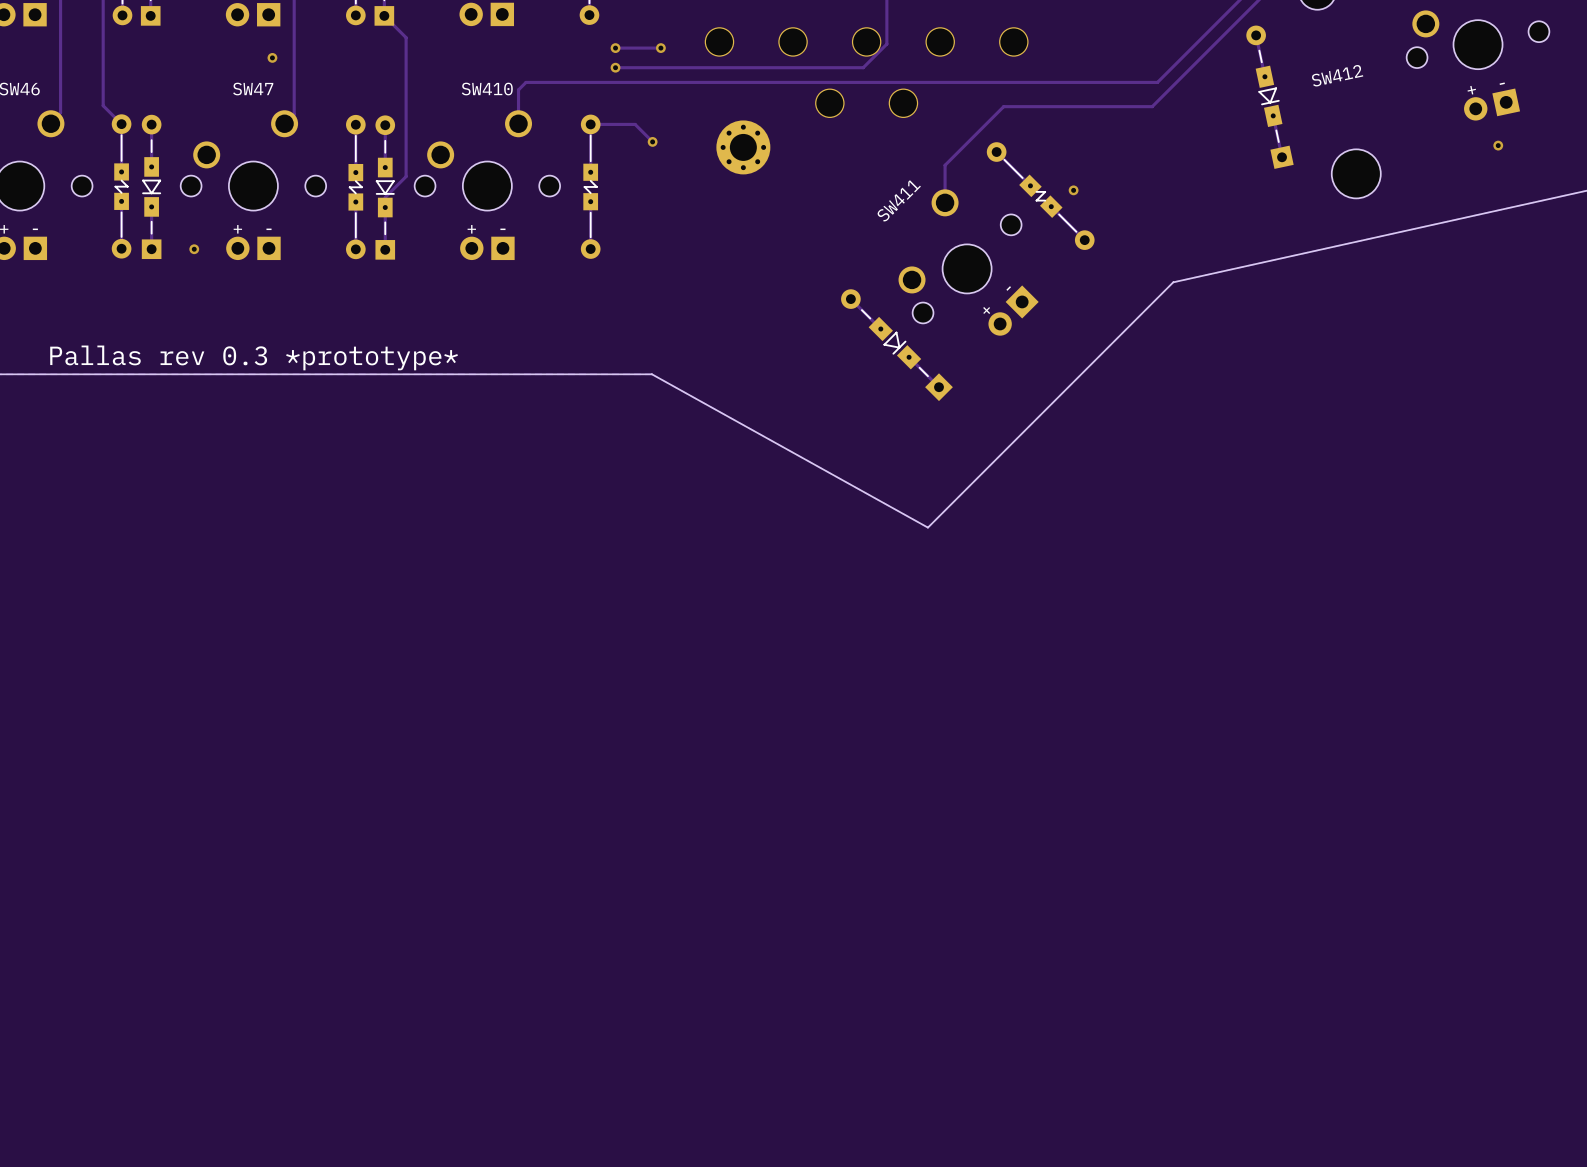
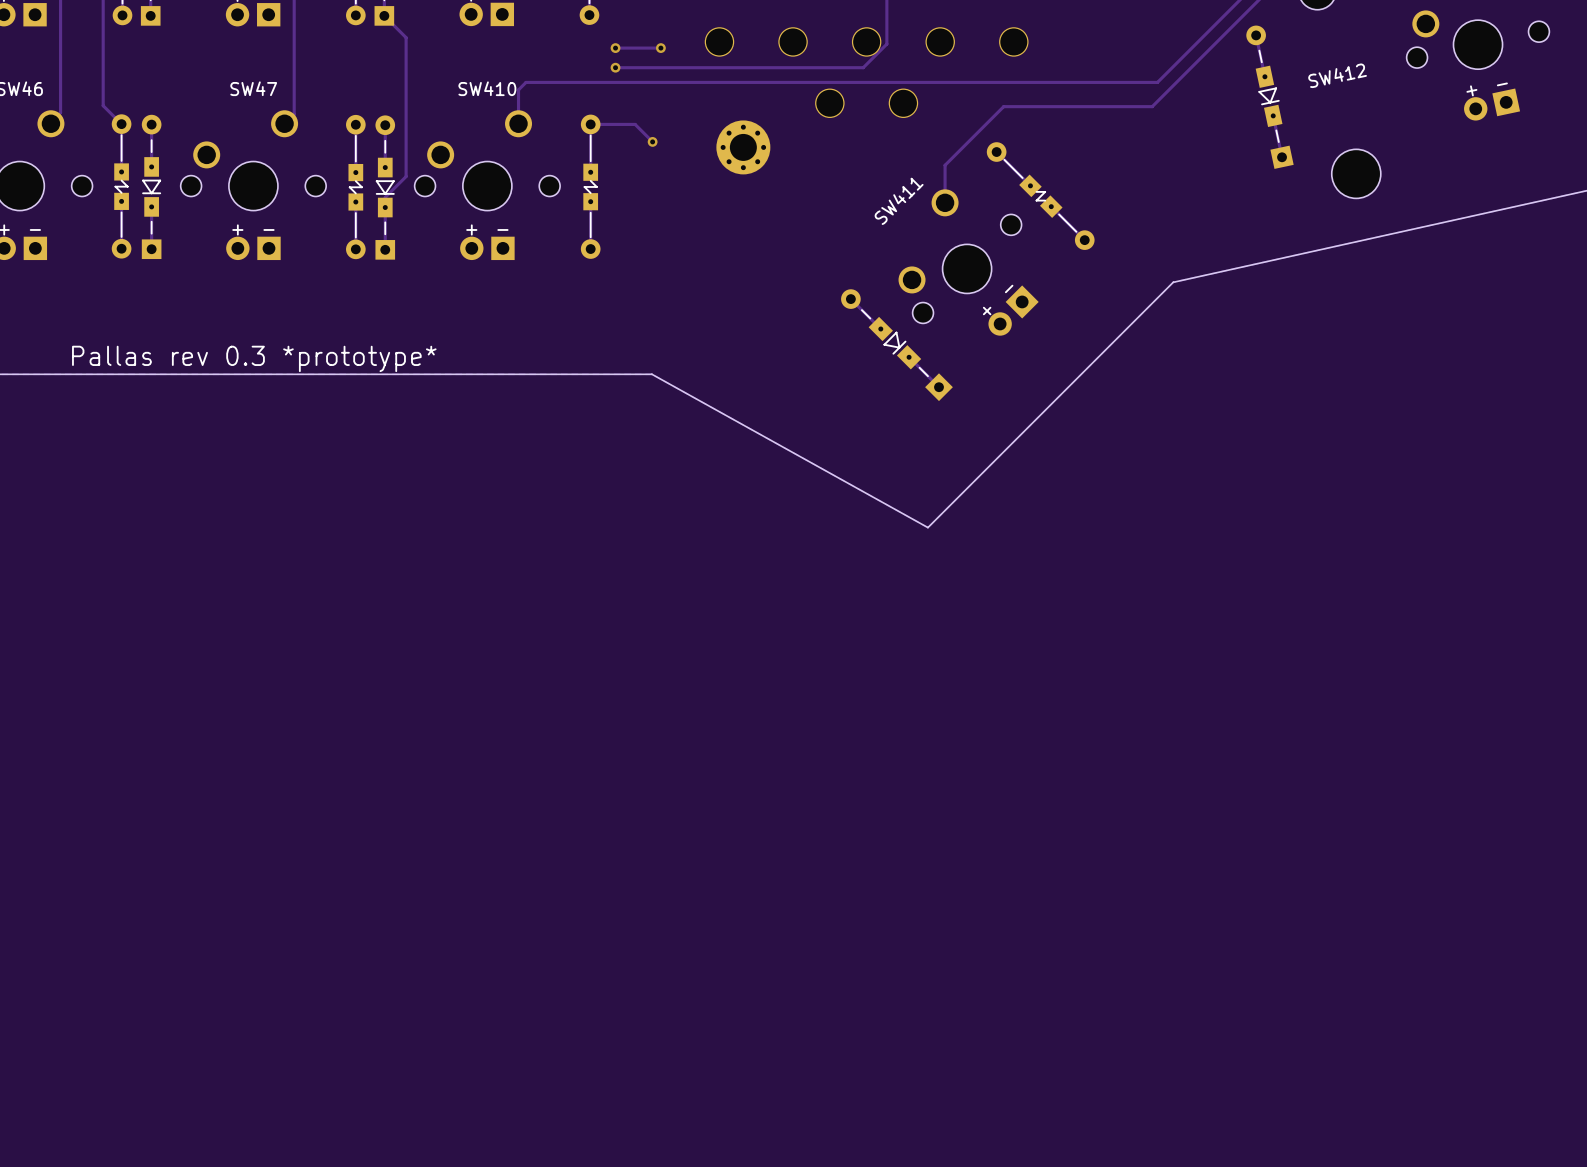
via: (272, 57) -> none
via: (1498, 145) -> none
via: (1073, 190) -> none
via: (194, 249) -> none

